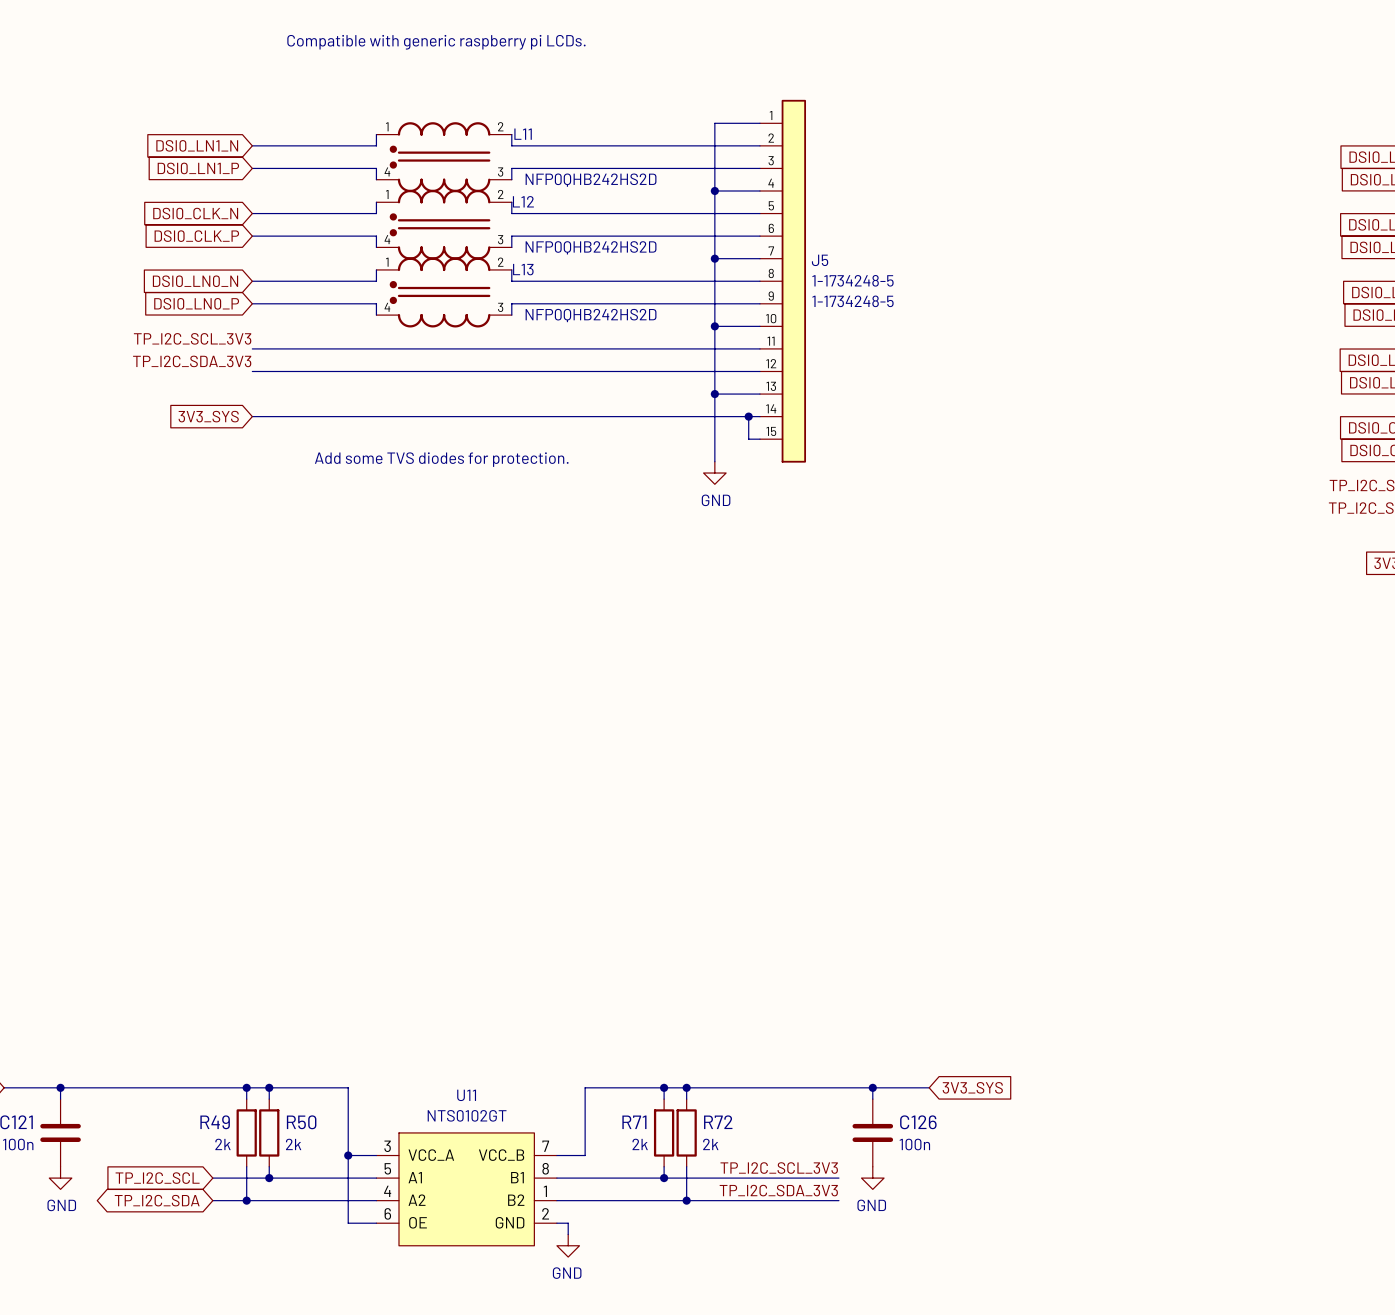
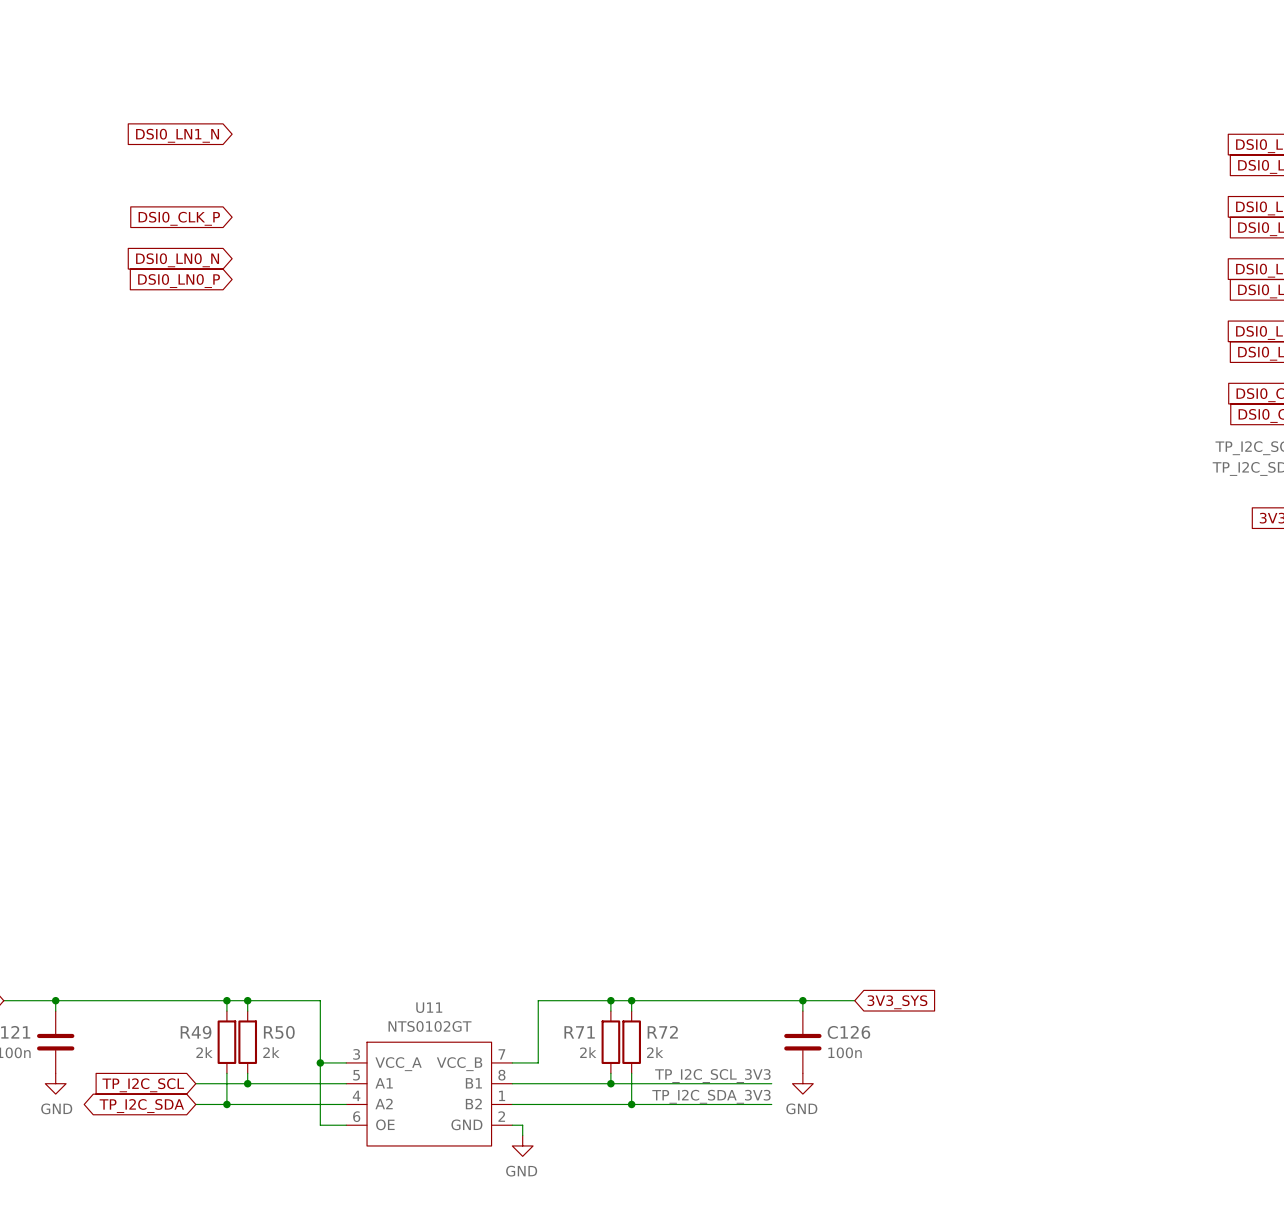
text: Compatible with generic raspberry pi LCDs. (436, 42) -> none
wire: (759, 123) (714, 123) (714, 461) -> none
wire: (376, 134) (376, 145) (252, 145) -> none
wire: (511, 134) (511, 145) (759, 145) -> none
L11: NFP0QHB242HS2D (444, 157) -> none
global label: DSI0_LN1_P (198, 168) -> none
wire: (252, 168) (376, 168) (376, 179) -> none
wire: (759, 168) (511, 168) (511, 179) -> none
wire: (714, 190) (759, 190) -> none
junction: (714, 190) -> none
wire: (376, 202) (376, 213) (252, 213) -> none
wire: (511, 202) (511, 213) (759, 213) -> none
global label: DSI0_CLK_N (195, 213) -> none
L12: NFP0QHB242HS2D (444, 224) -> none
wire: (252, 236) (376, 236) (376, 247) -> none
wire: (759, 236) (511, 236) (511, 247) -> none
wire: (714, 258) (759, 258) -> none
junction: (714, 258) -> none
wire: (376, 269) (376, 281) (252, 281) -> none
wire: (511, 269) (511, 281) (759, 281) -> none
J5: 1-1734248-5 (782, 281) -> none
L13: NFP0QHB242HS2D (444, 292) -> none
wire: (252, 303) (376, 303) (376, 315) -> none
wire: (759, 303) (511, 303) (511, 315) -> none
wire: (714, 326) (759, 326) -> none
junction: (714, 326) -> none
label: TP_I2C_SCL_3V3 (192, 338) -> none
wire: (252, 348) (759, 348) -> none
label: TP_I2C_SDA_3V3 (192, 361) -> none
wire: (252, 371) (759, 371) -> none
wire: (714, 394) (759, 394) -> none
junction: (714, 394) -> none
global label: 3V3_SYS (208, 416) -> none
wire: (252, 416) (759, 416) -> none
wire: (748, 416) (748, 439) (759, 439) -> none
junction: (748, 416) -> none
text: Add some TVS diodes for protection. (441, 459) -> none
power symbol: GND (714, 473) -> none

